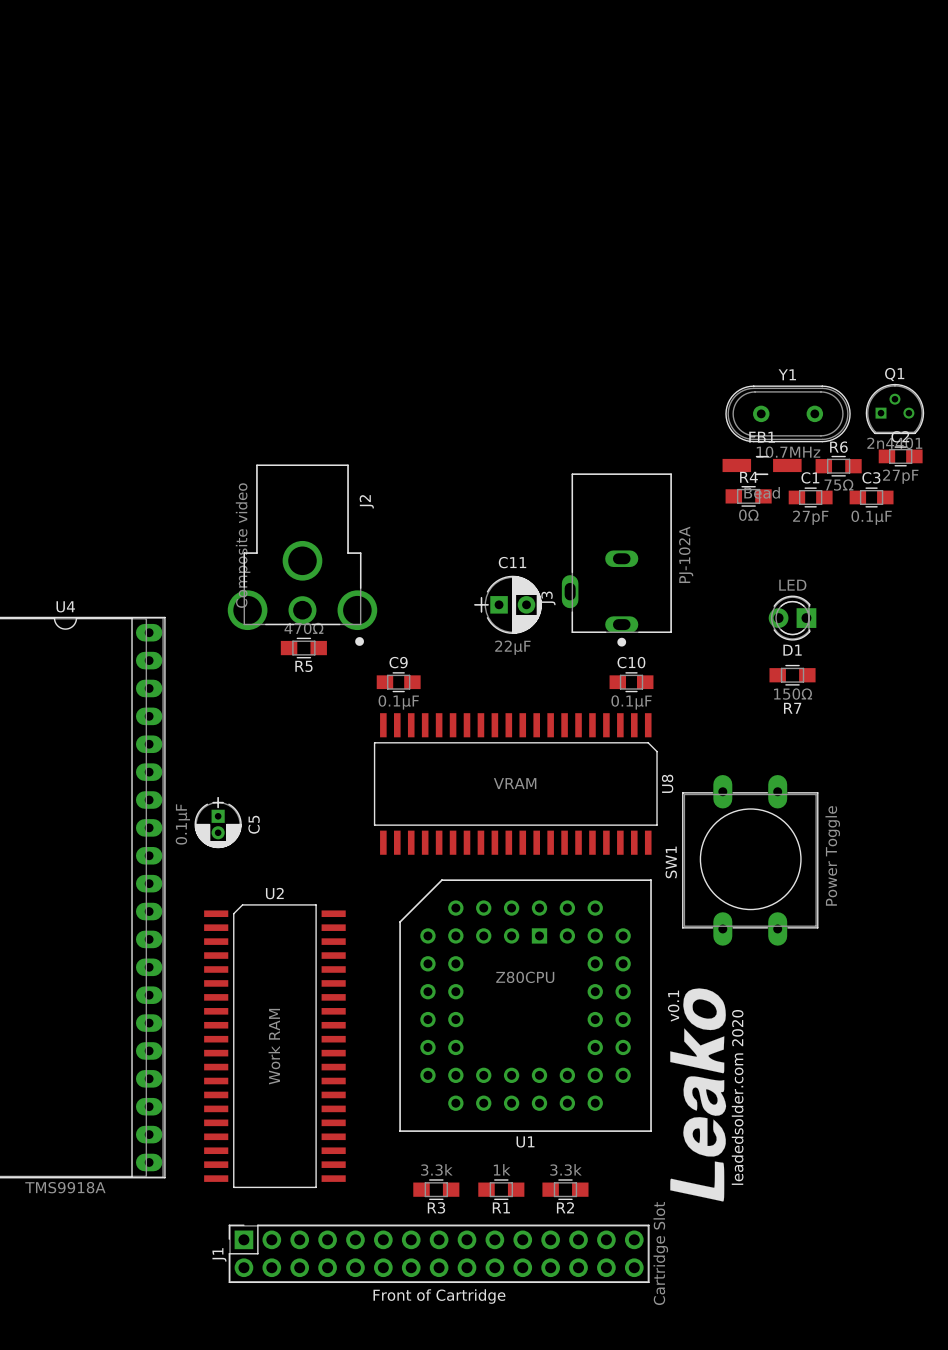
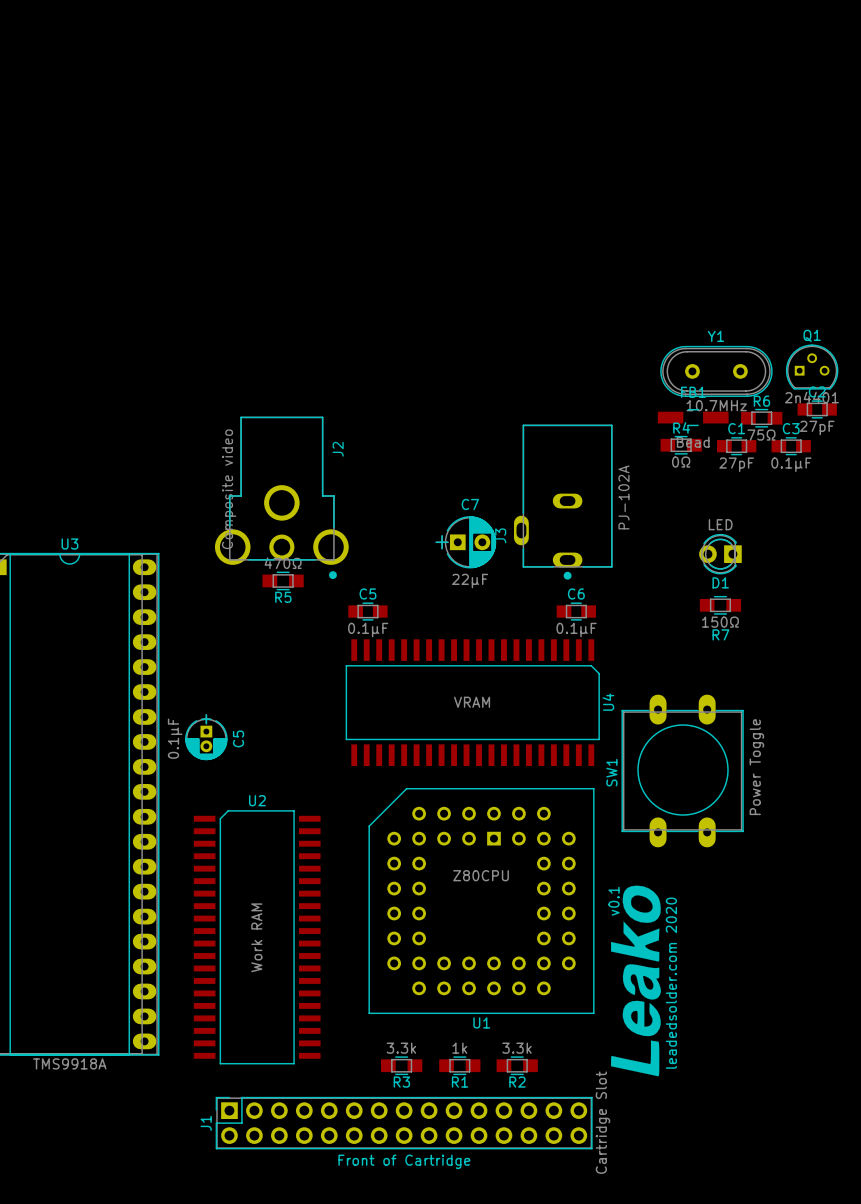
C11 name: C11 (512, 562) -> C7 (470, 504)
U4 name: U4 (65, 606) -> U3 (69, 543)
C9 name: C9 (398, 662) -> C5 (367, 593)
C10 name: C10 (631, 662) -> C6 (576, 593)
U8 name: U8 (667, 783) -> U4 (608, 702)

